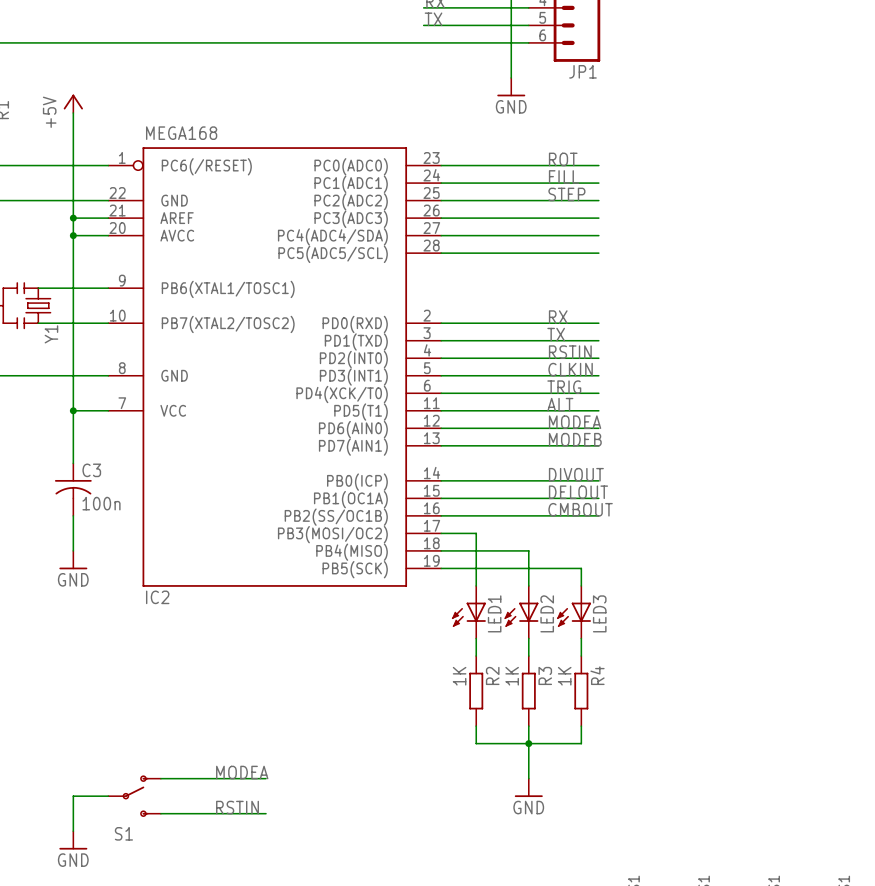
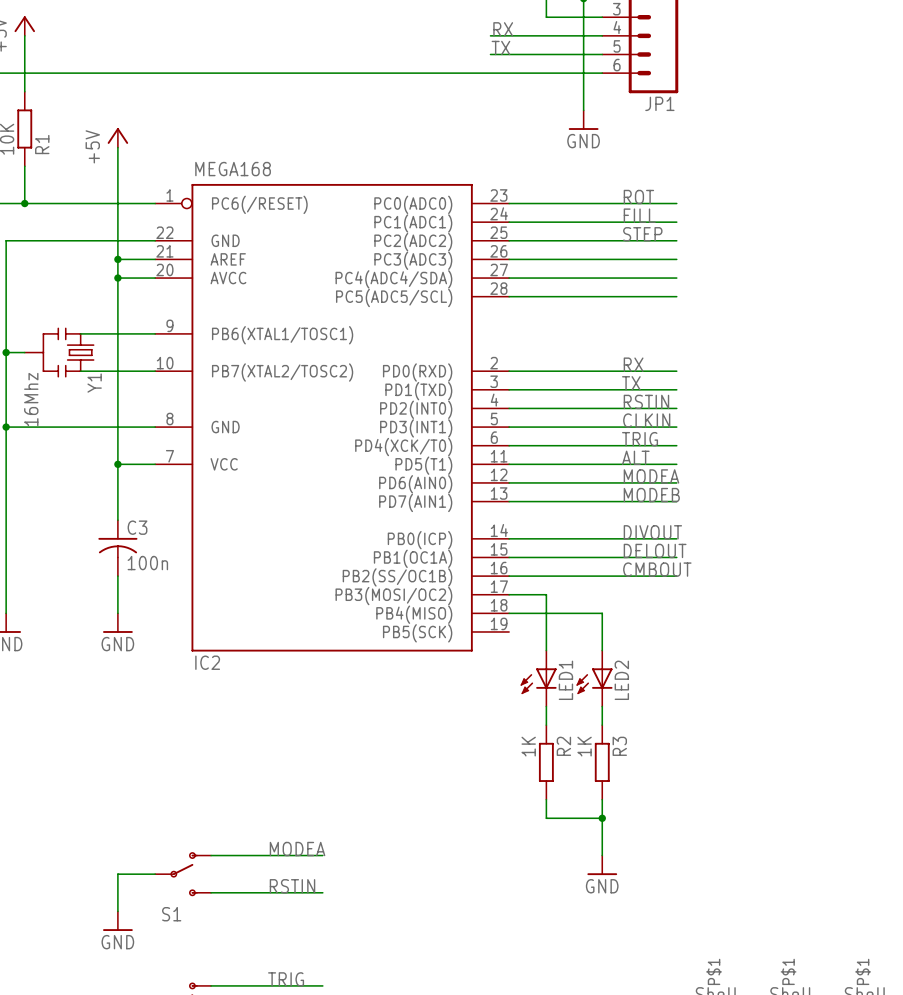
wire: (441, 568) (581, 568) (581, 585) -> none
LED3: (574, 612) -> none
wire: (581, 638) (581, 656) -> none
R4: 1K (581, 691) -> none
wire: (581, 726) (581, 743) (528, 743) -> none

